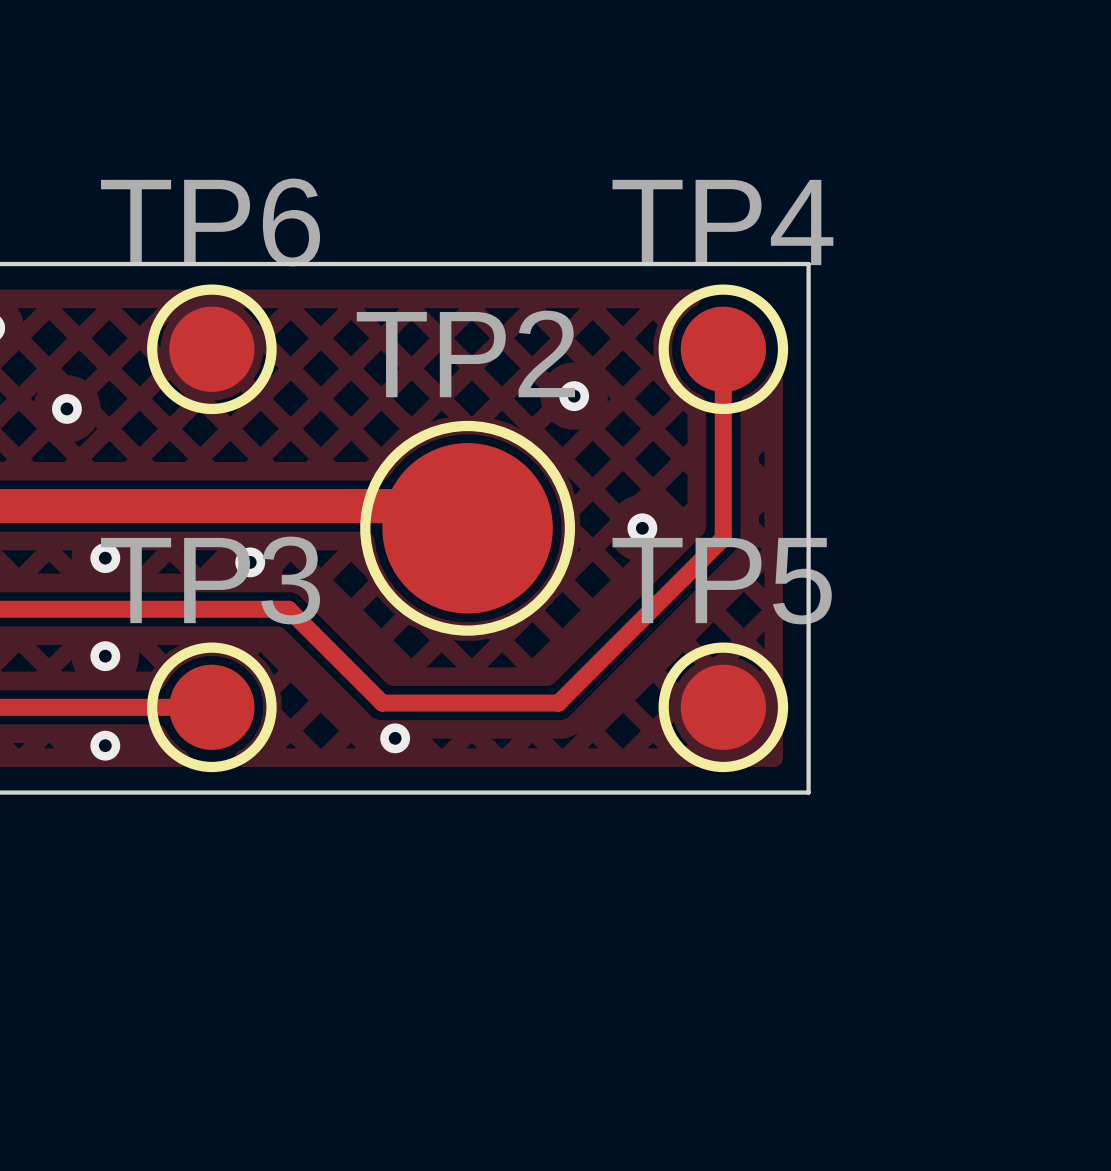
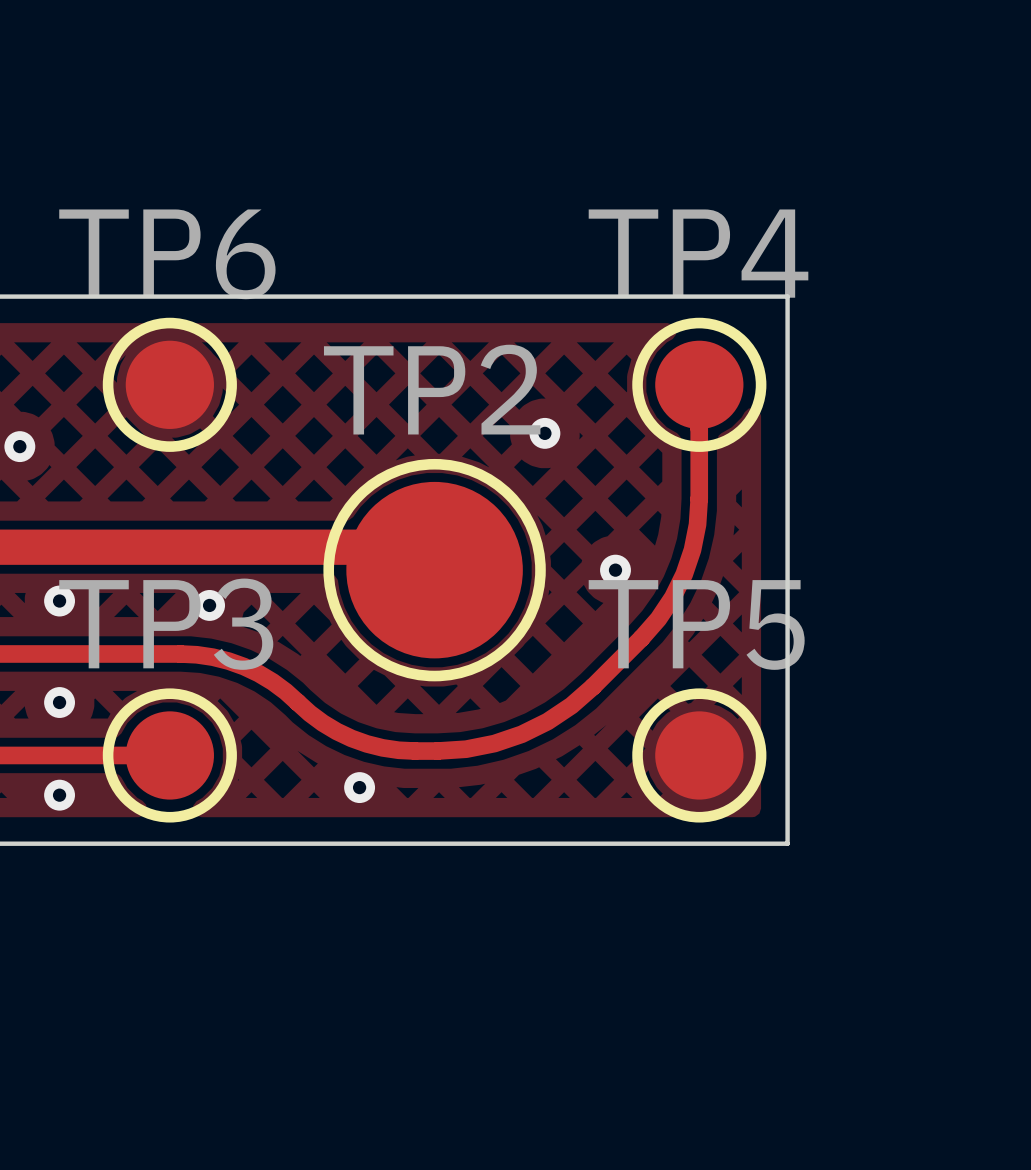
track: (723, 459) (723, 538) (667, 594) -> (699, 498) (697, 524) (692, 549) (684, 574) (672, 597) (658, 618) (641, 638)
track: (222, 609) (288, 609) (382, 703) (448, 703) -> (180, 653) (212, 657) (244, 666) (272, 681) (309, 713) (336, 731) (366, 743) (382, 747) (414, 751)
track: (620, 640) (558, 703) (470, 703) -> (593, 686) (571, 705) (547, 721) (521, 734) (494, 743) (466, 749) (437, 751)

